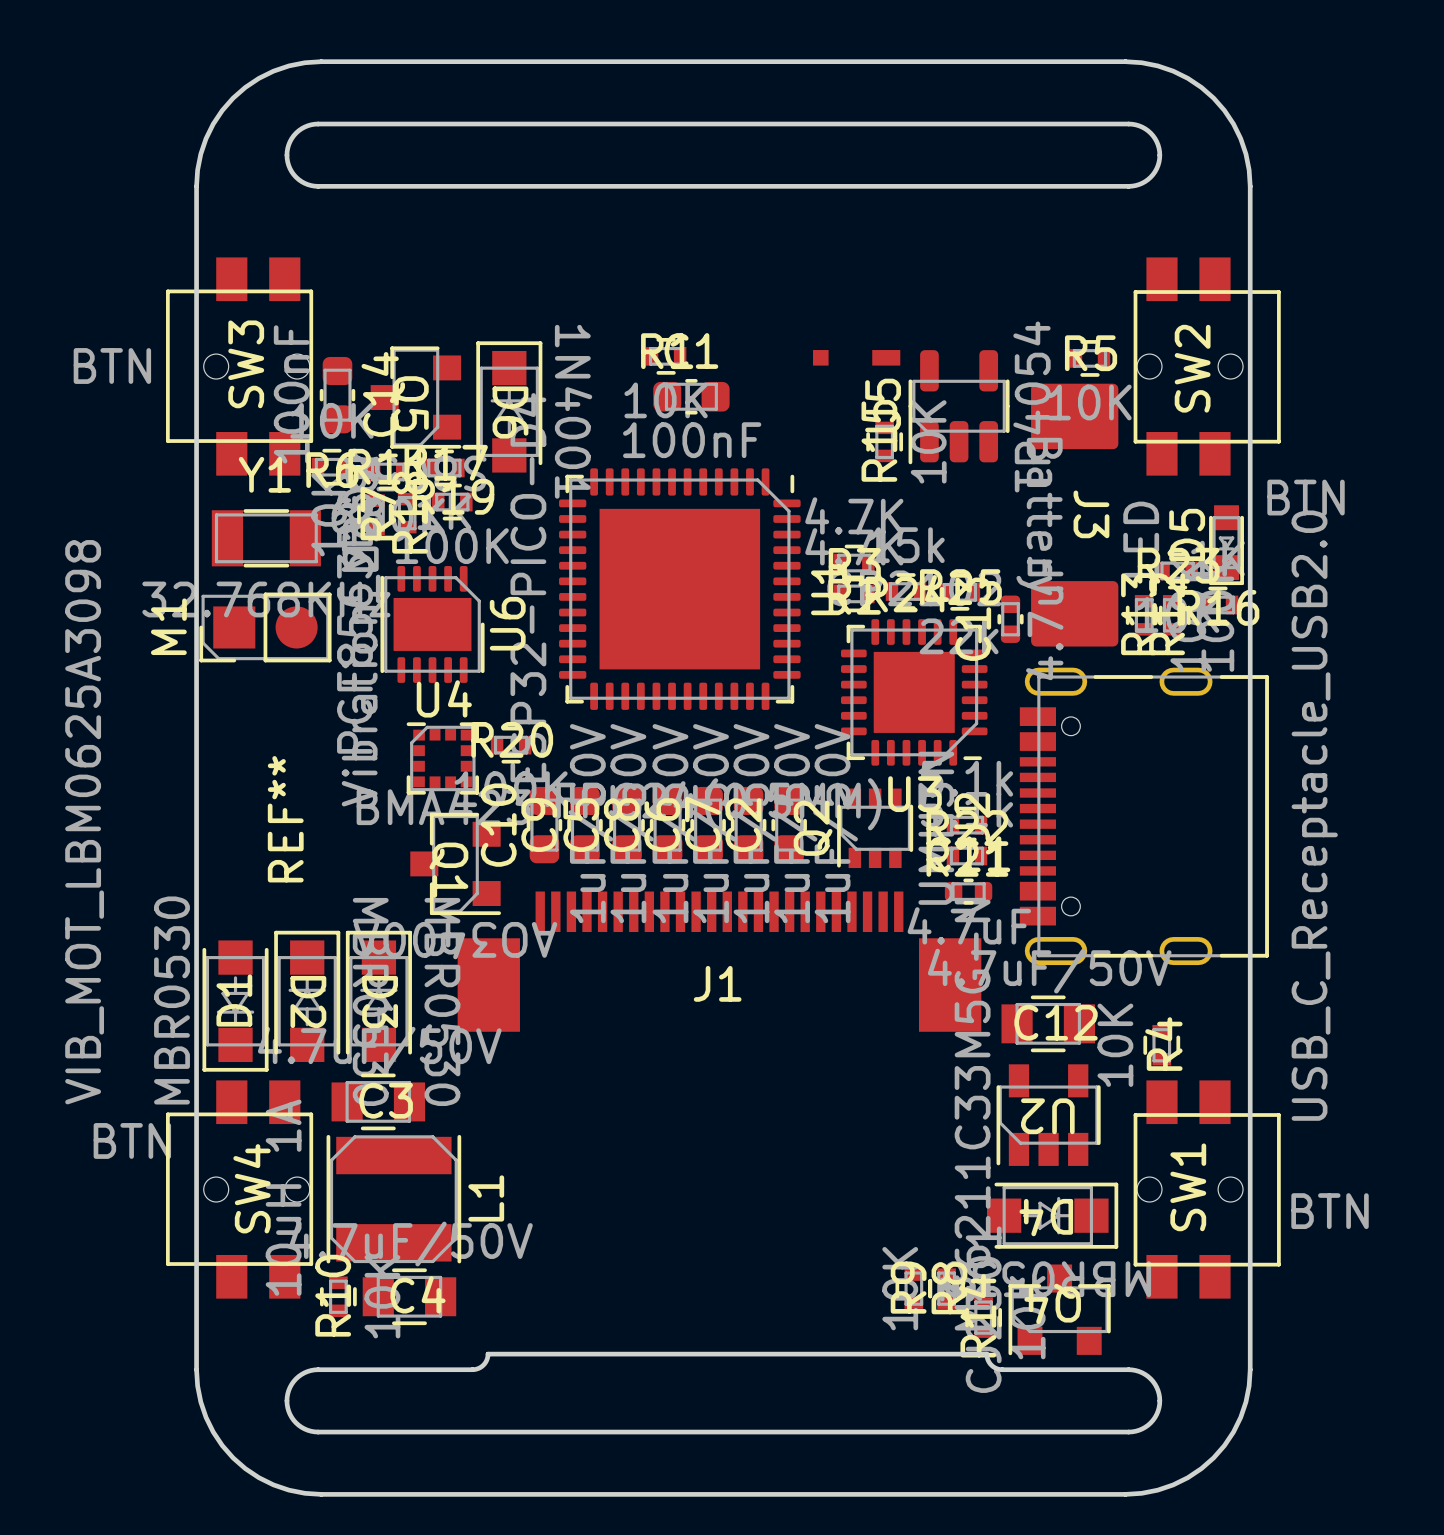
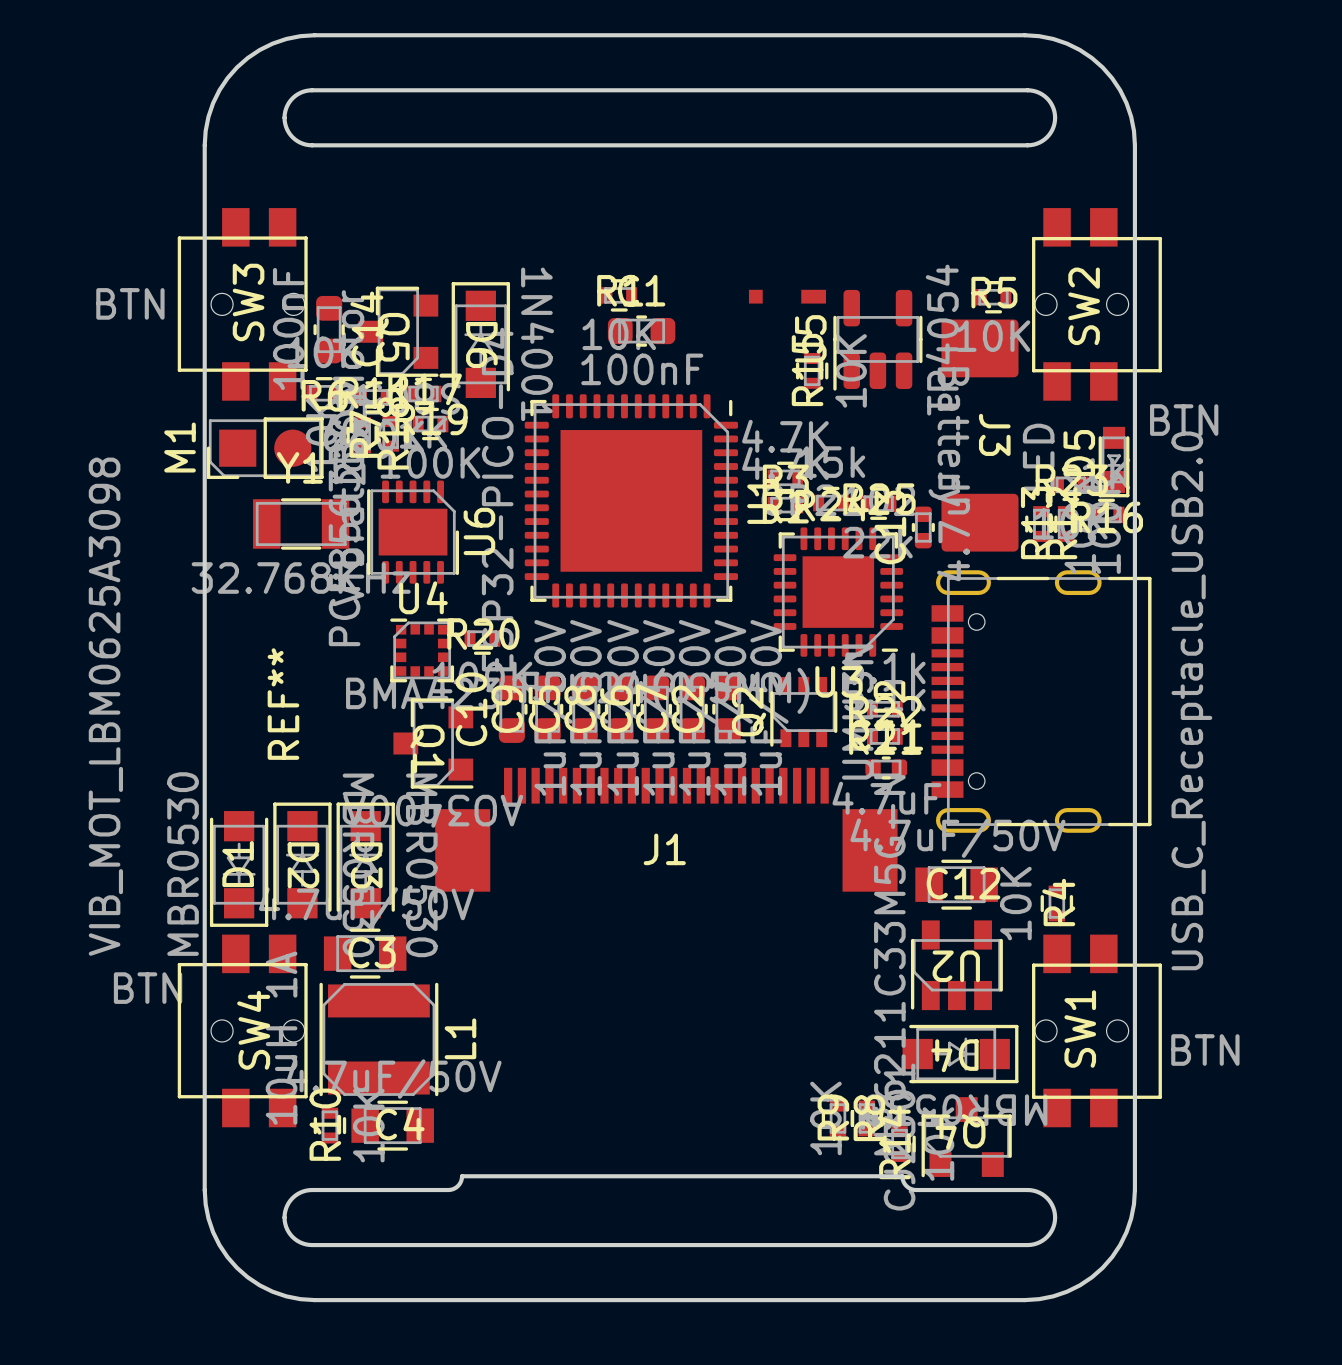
Y1 position: (266, 538) -> (301, 523)
M1 position: (265, 627) -> (265, 448)

